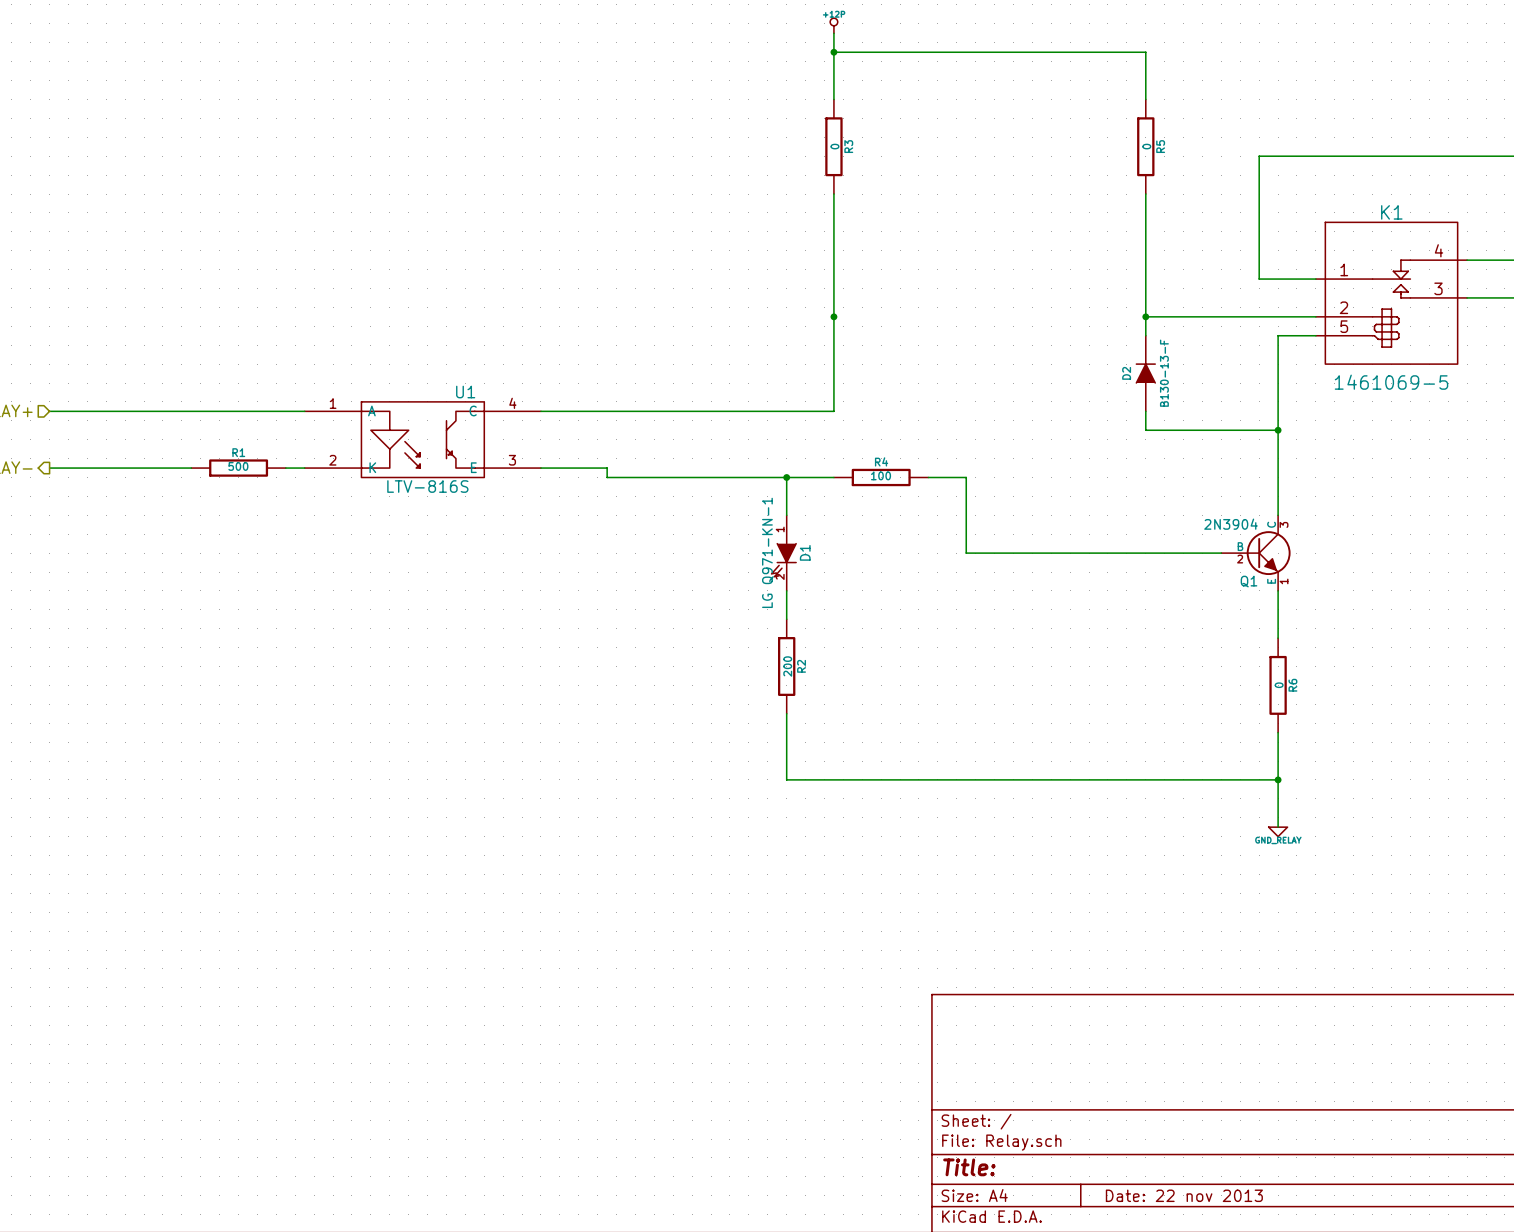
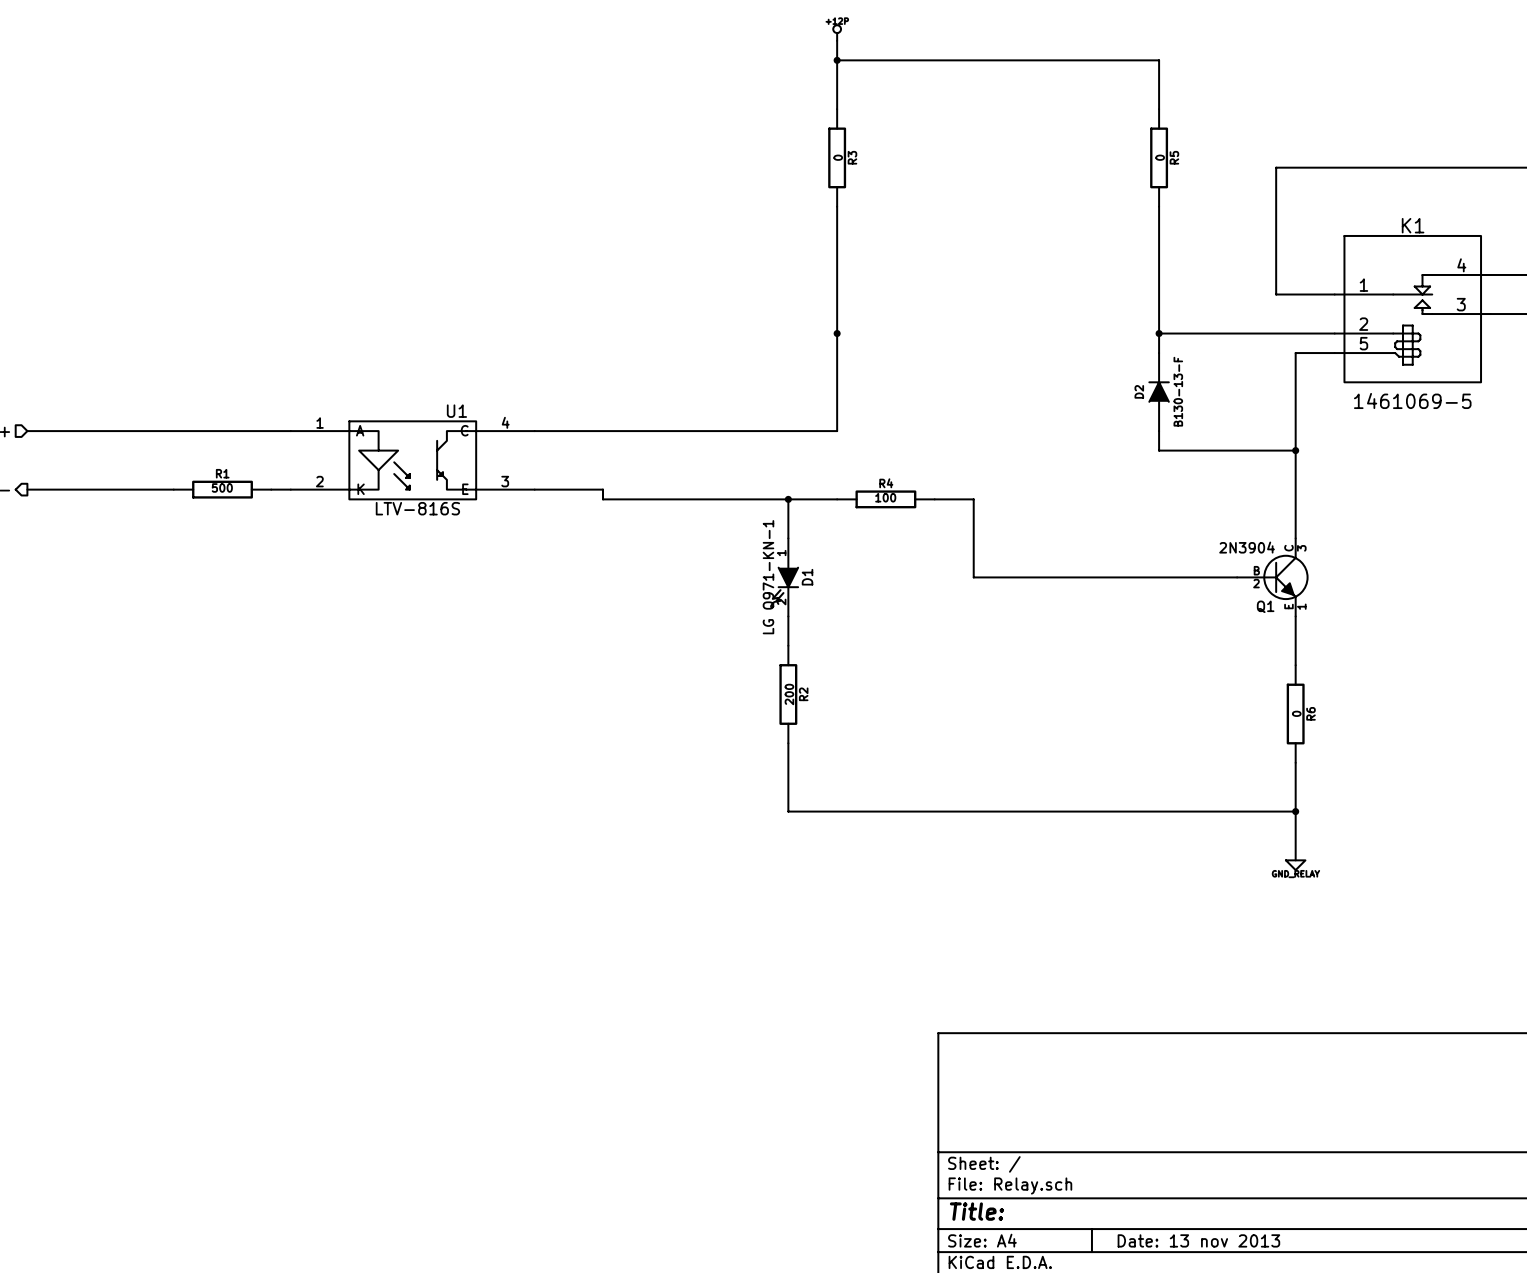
title block: Date: 22 nov 2013 (1184, 1195) -> Date: 13 nov 2013 (1198, 1240)

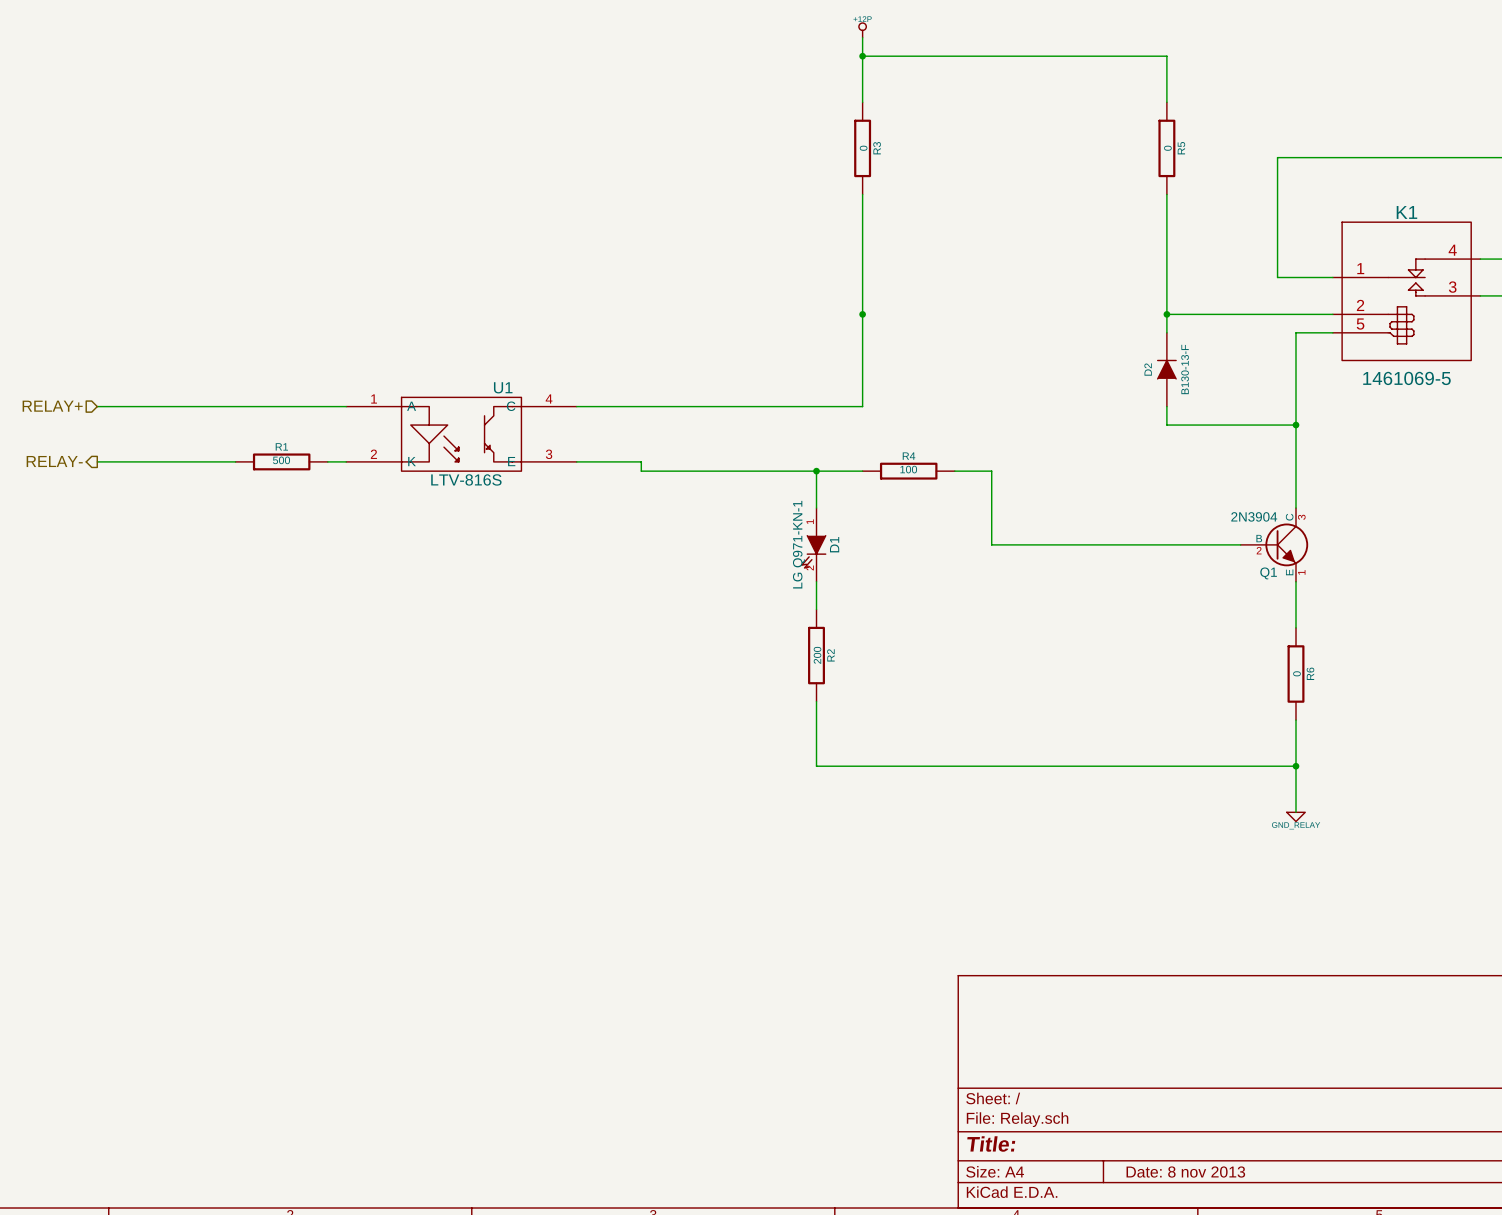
title block: Date: 13 nov 2013 (1198, 1240) -> Date: 8 nov 2013 (1185, 1172)

